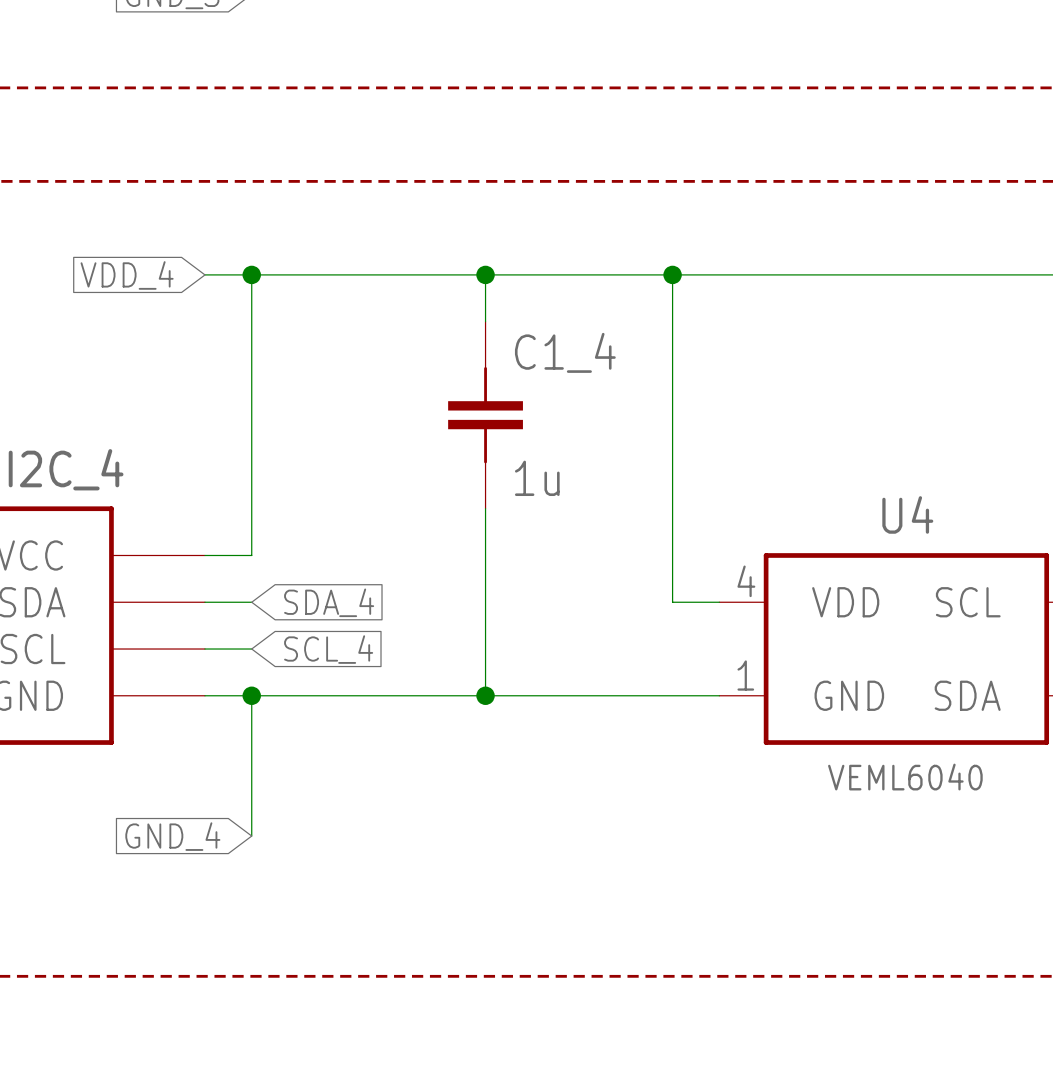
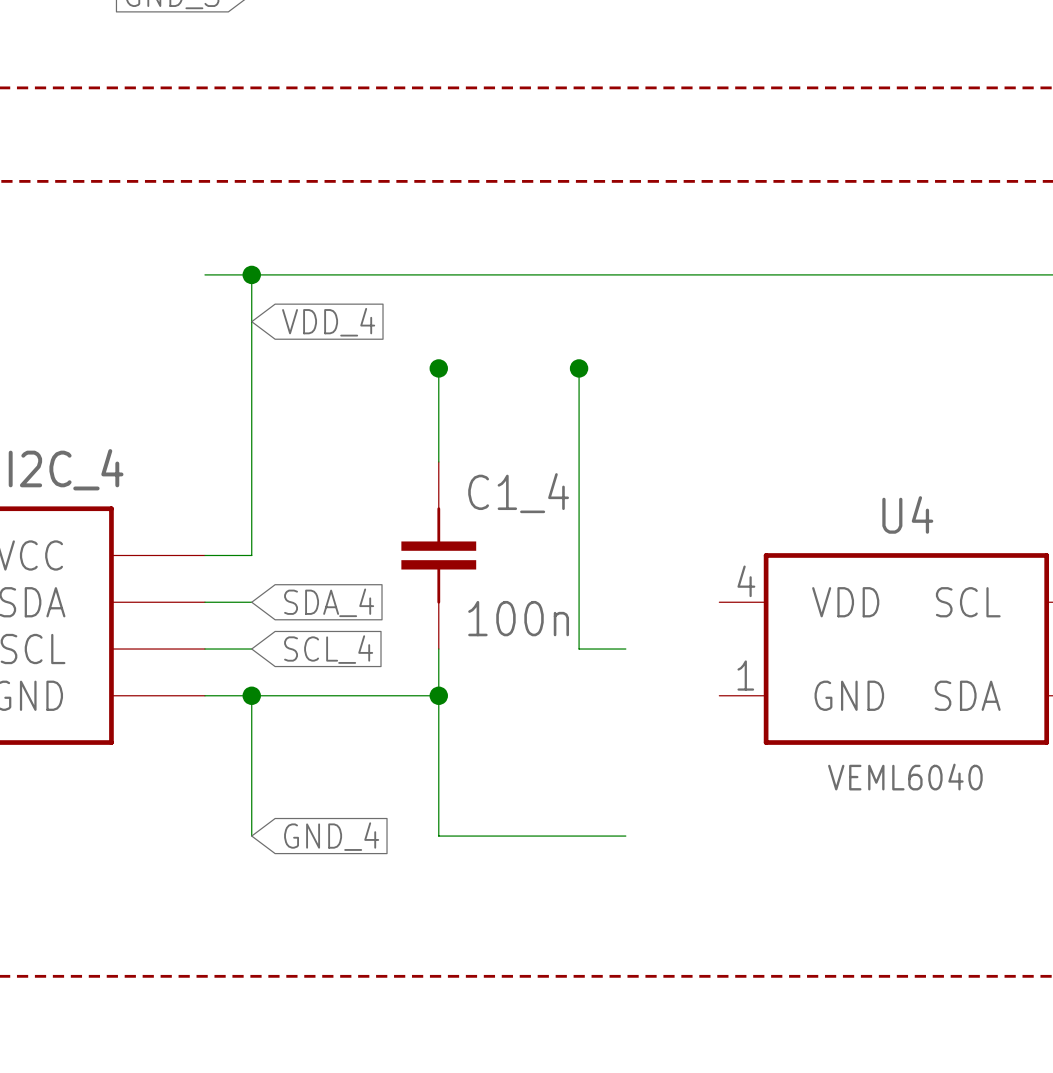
wire: (485, 274) (485, 321) -> none
junction: (485, 274) -> none
wire: (672, 274) (672, 602) (719, 602) -> none
junction: (672, 274) -> none
global label rotation: 0° (127, 275) -> 180° (328, 322)
global label position: VDD_4 (127, 275) -> VDD_4 (328, 322)
wire: none -> (438, 368) (438, 461)
junction: none -> (438, 368)
wire: none -> (579, 368) (579, 649) (625, 649)
junction: none -> (579, 368)
C1_4 position: (485, 415) -> (438, 555)
C1_4 value: 1u (537, 478) -> 100n (518, 618)
wire: (485, 508) (485, 695) -> none
wire: none -> (438, 649) (438, 836) (625, 836)
wire: (438, 695) (719, 695) -> none
junction position: (485, 695) -> (438, 695)
global label rotation: 0° (172, 836) -> 180° (331, 836)

